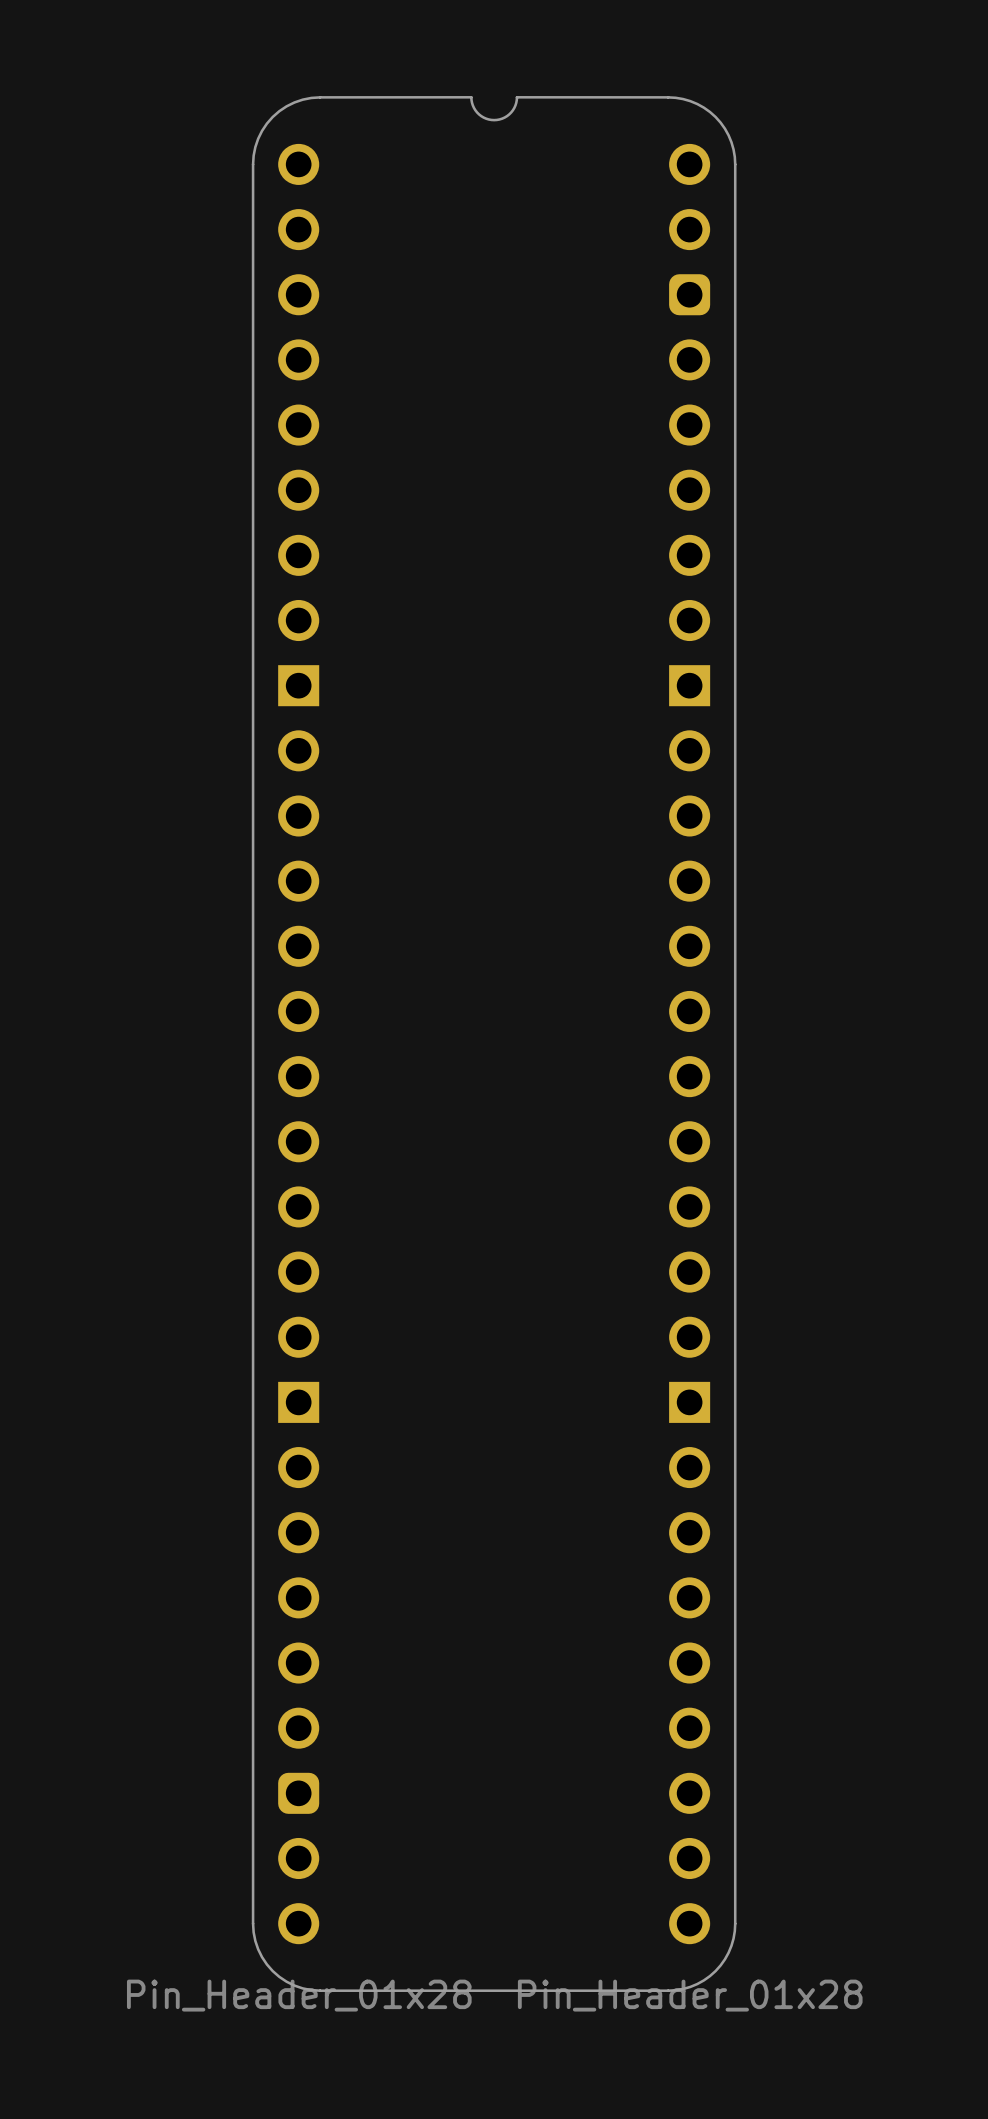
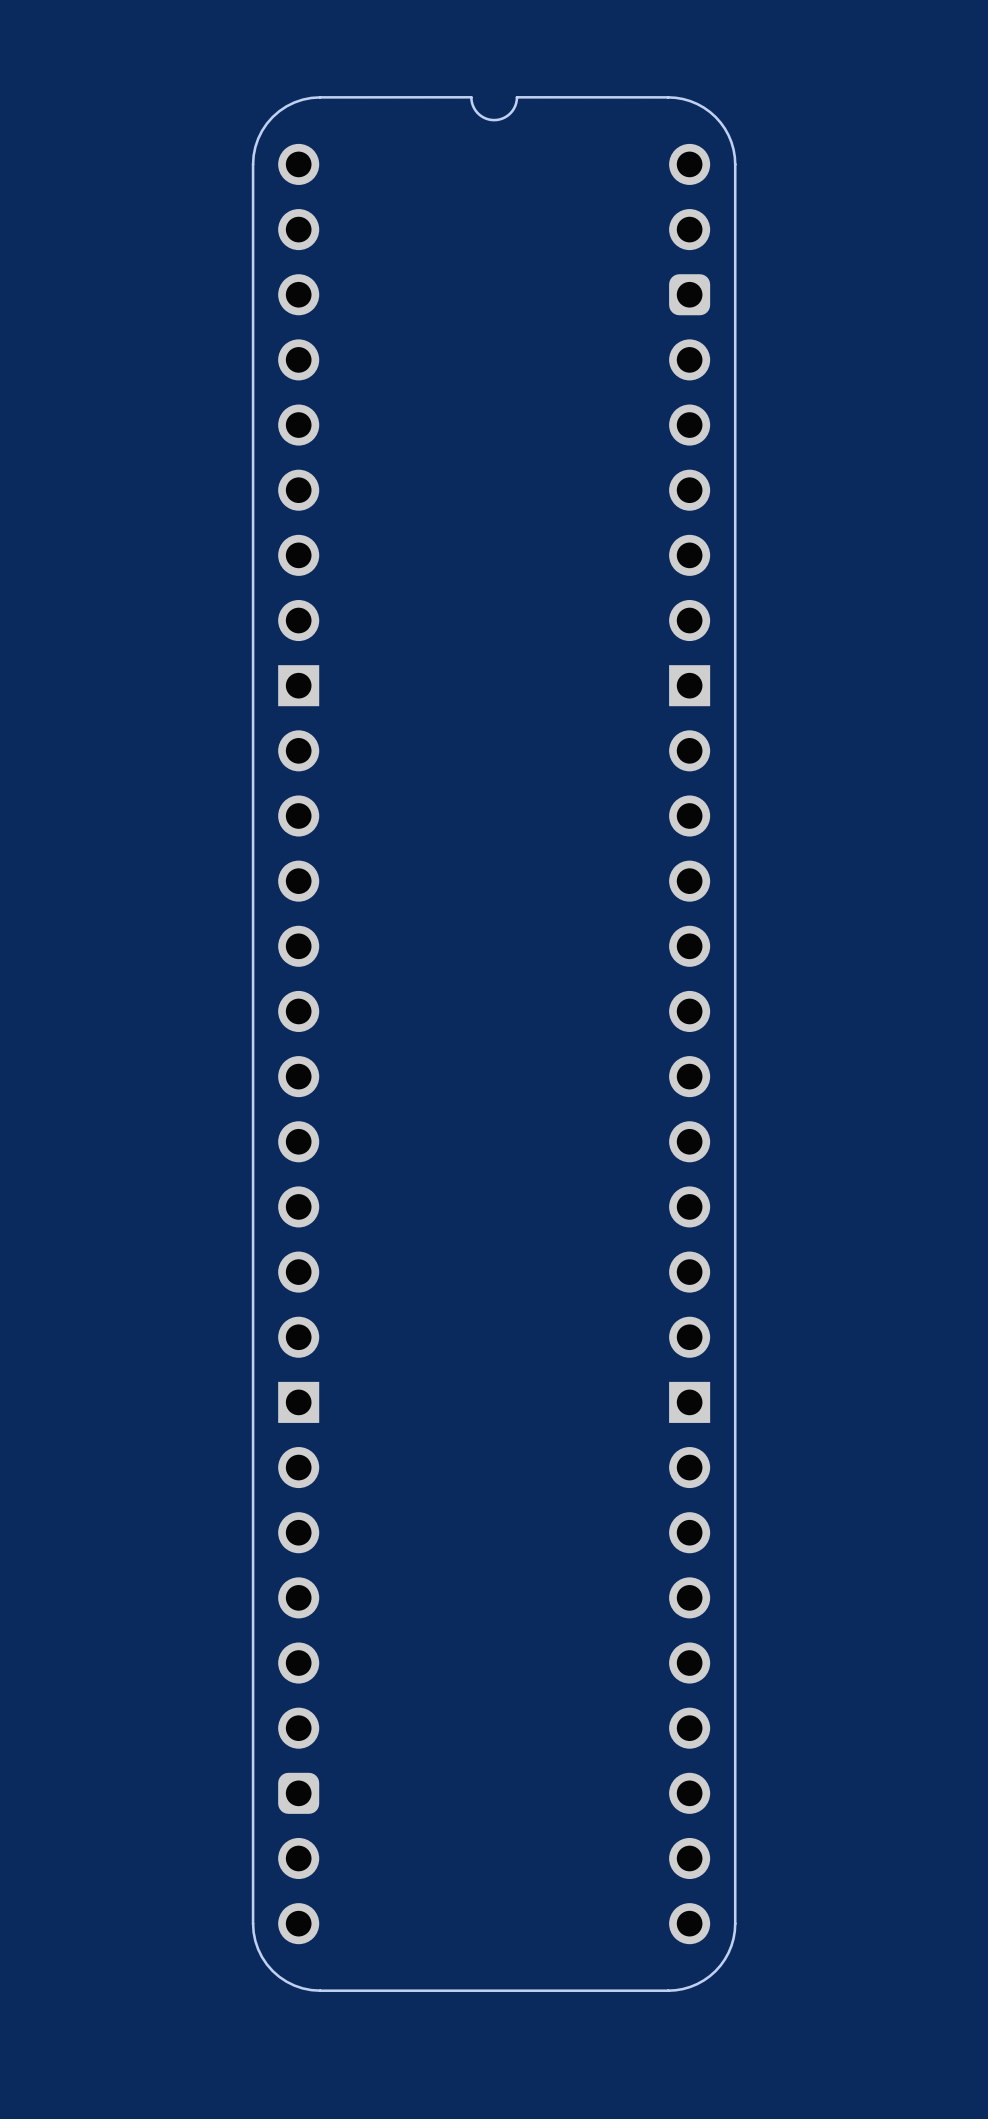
drawing: [126, 1979, 863, 2012] -> none

